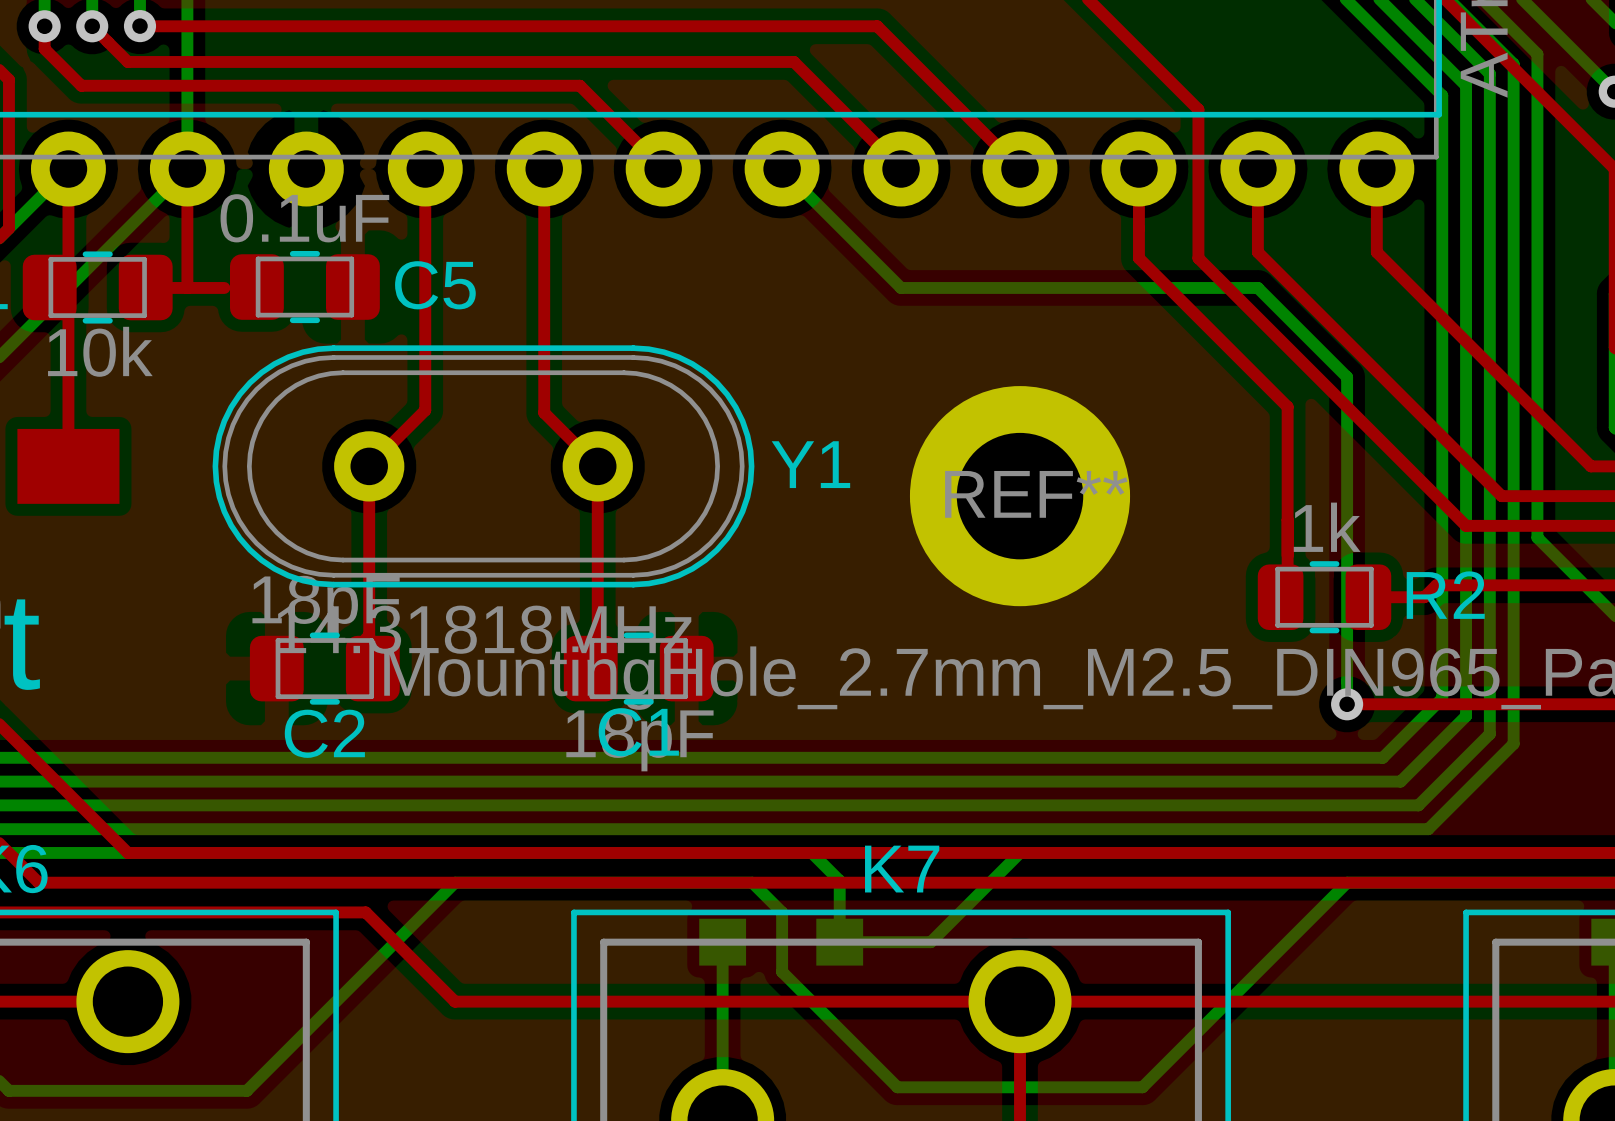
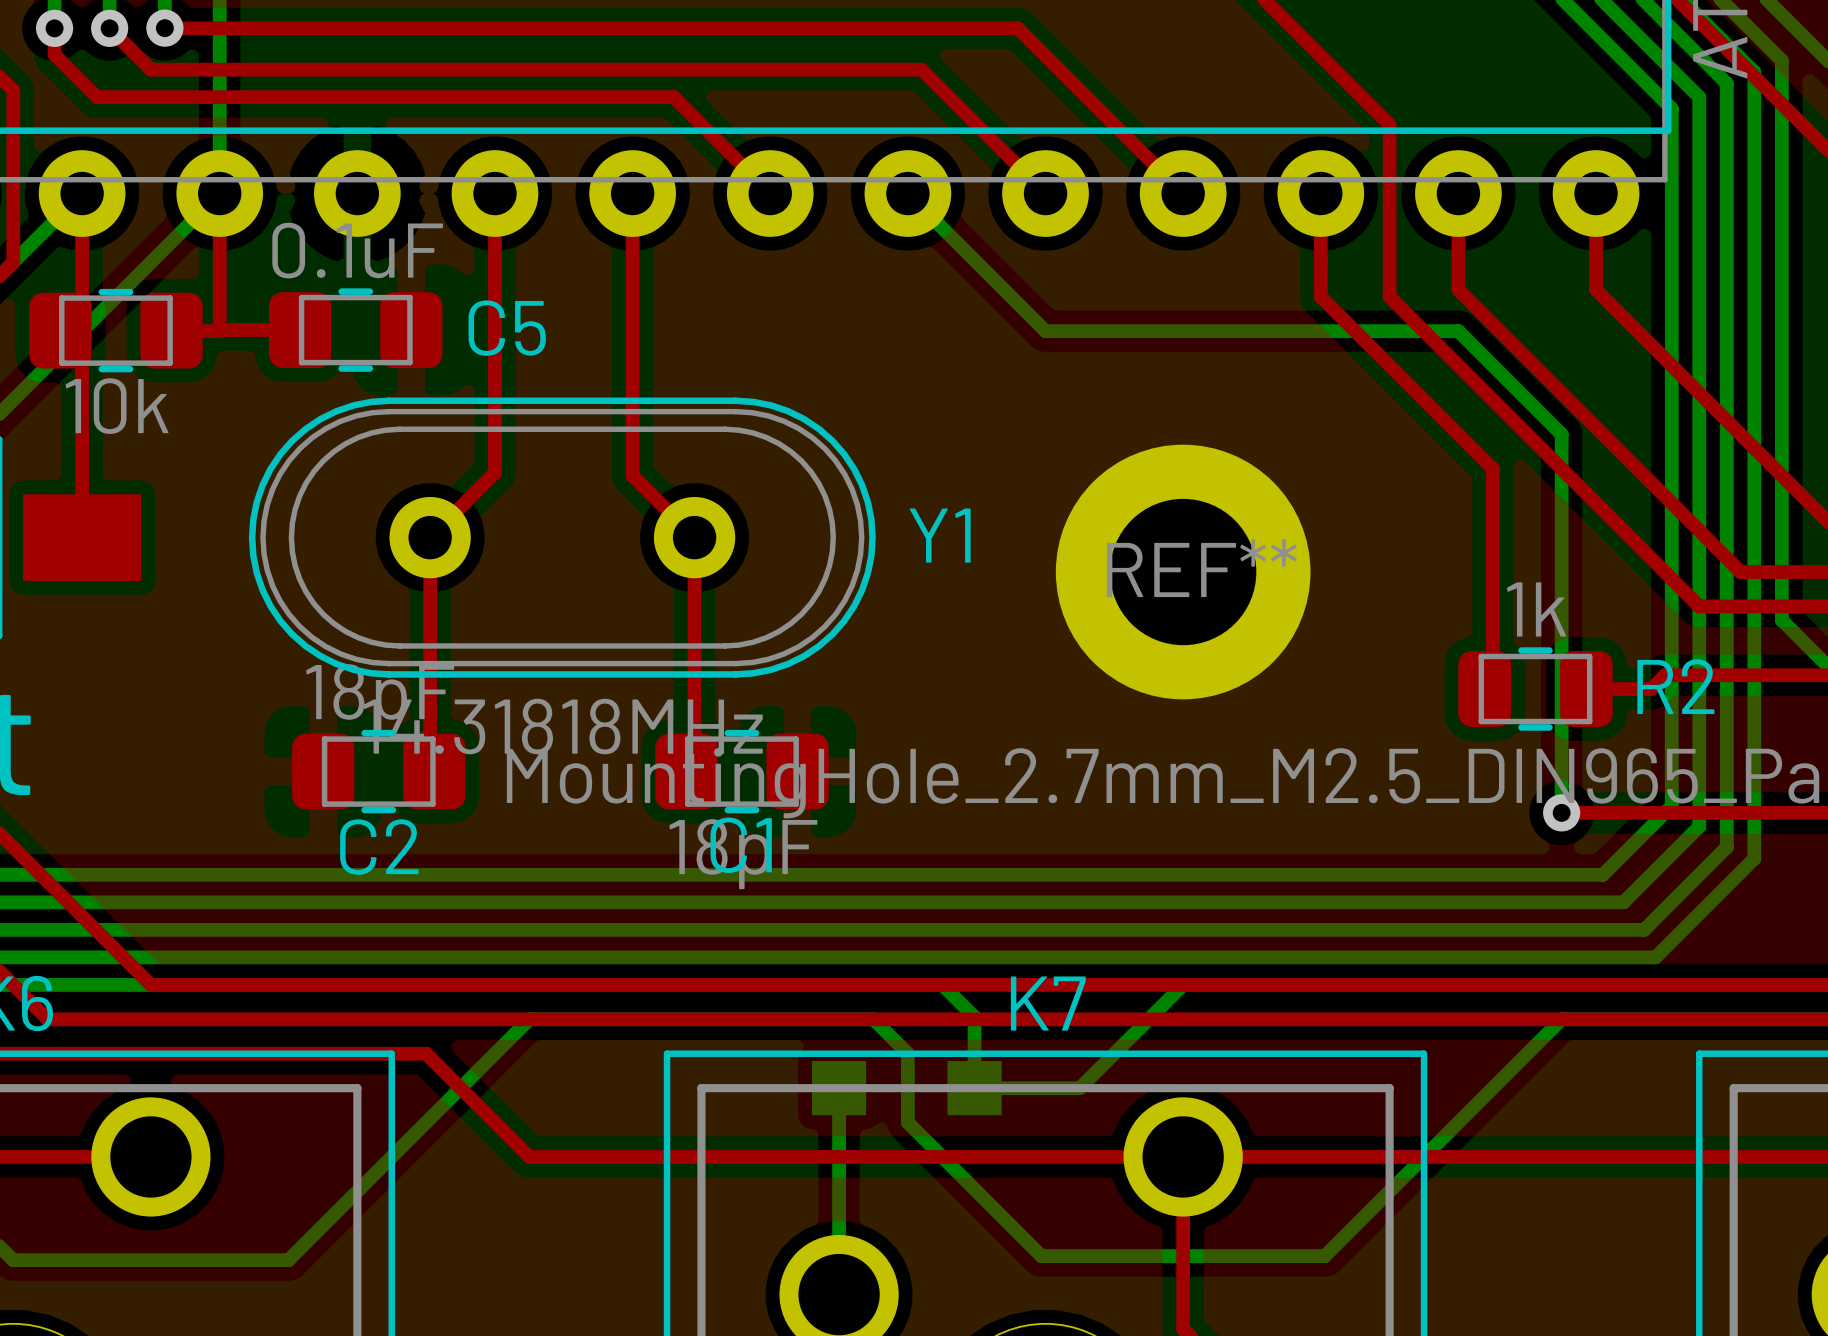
top track: (187, 287) (224, 287) -> (219, 331) (300, 330)

